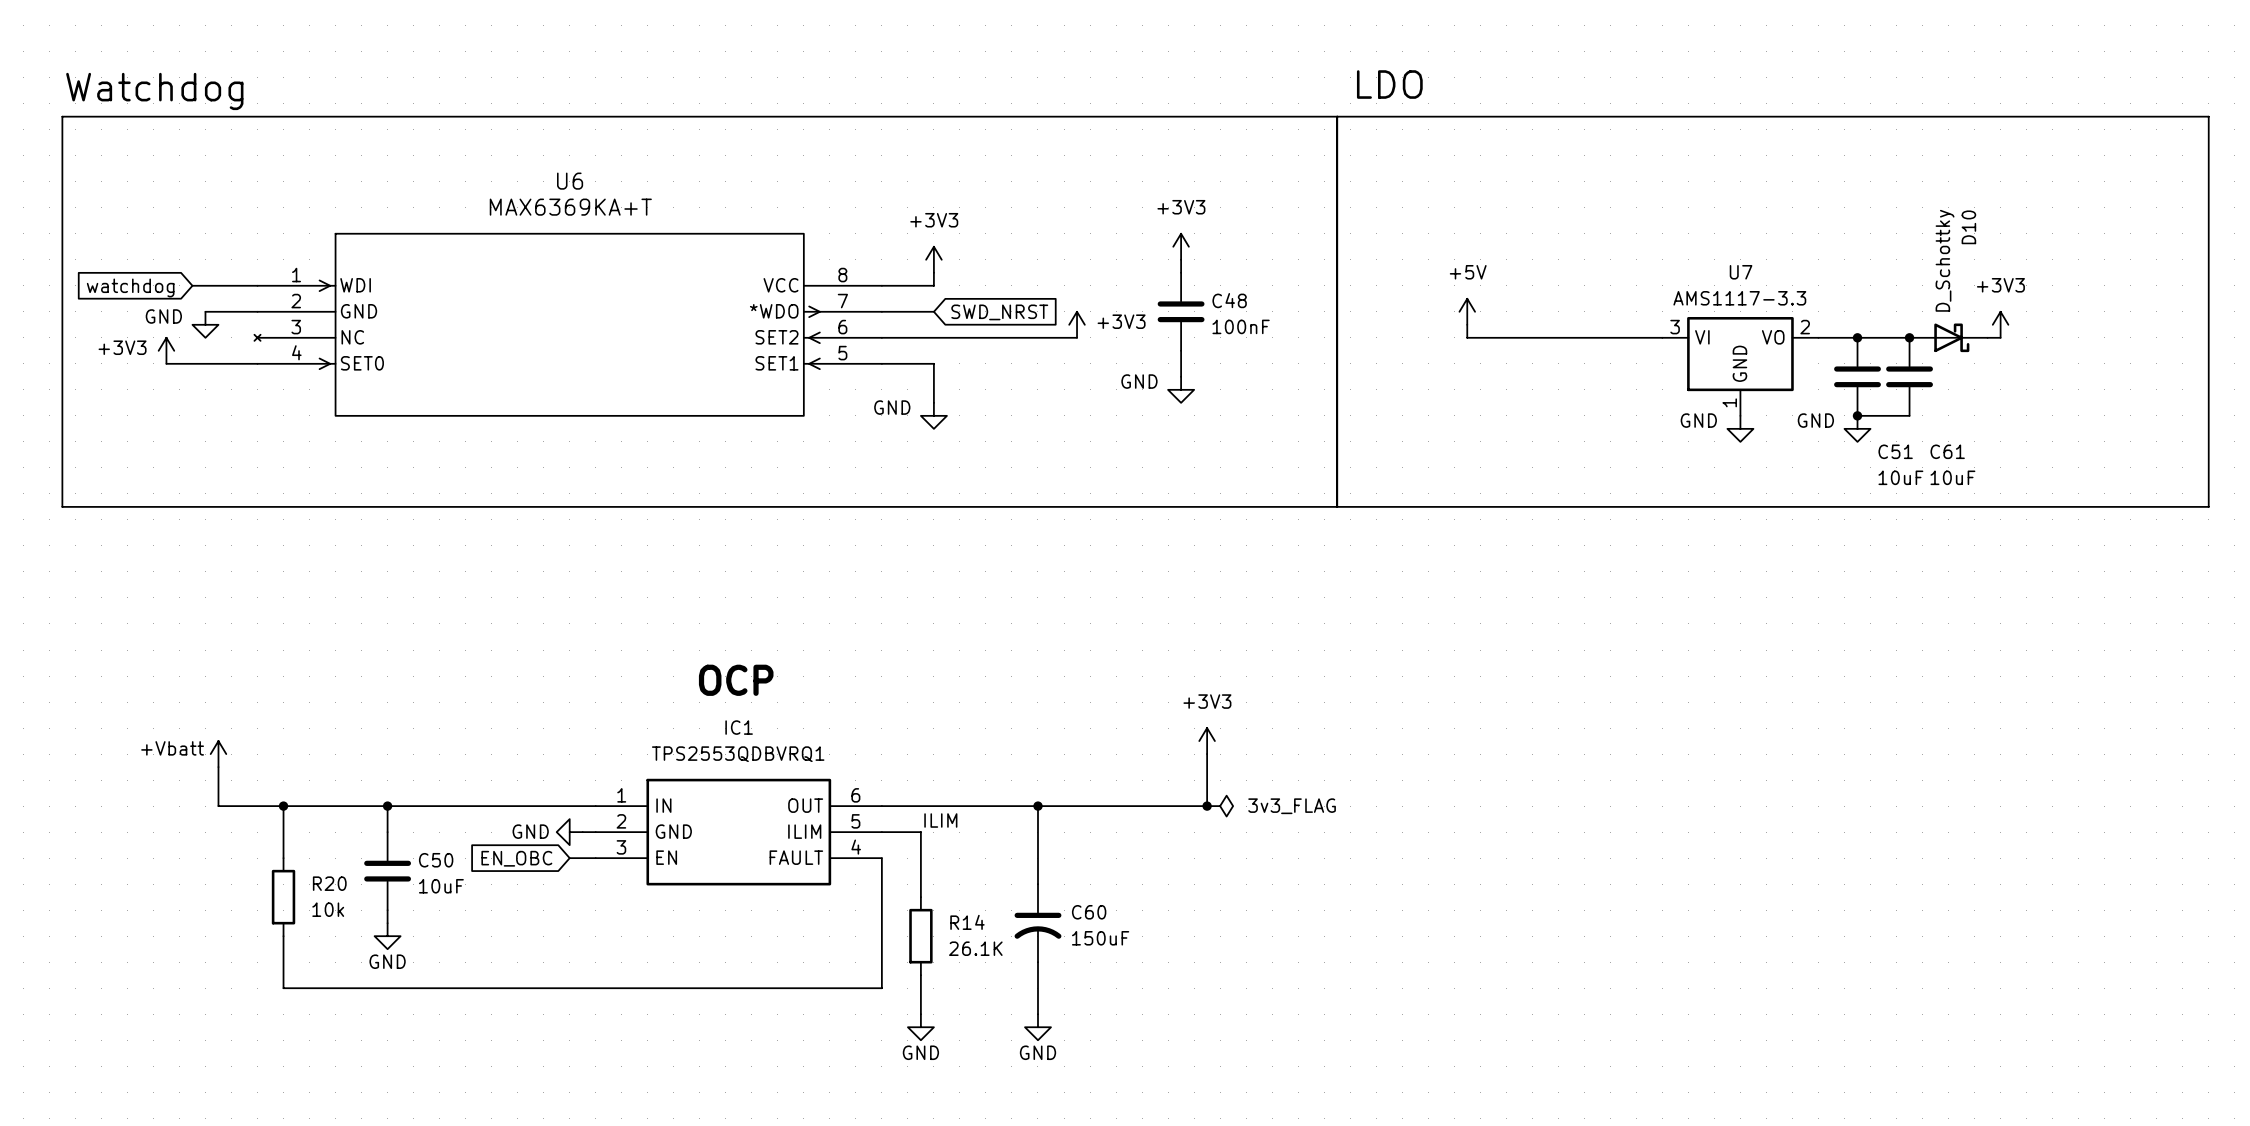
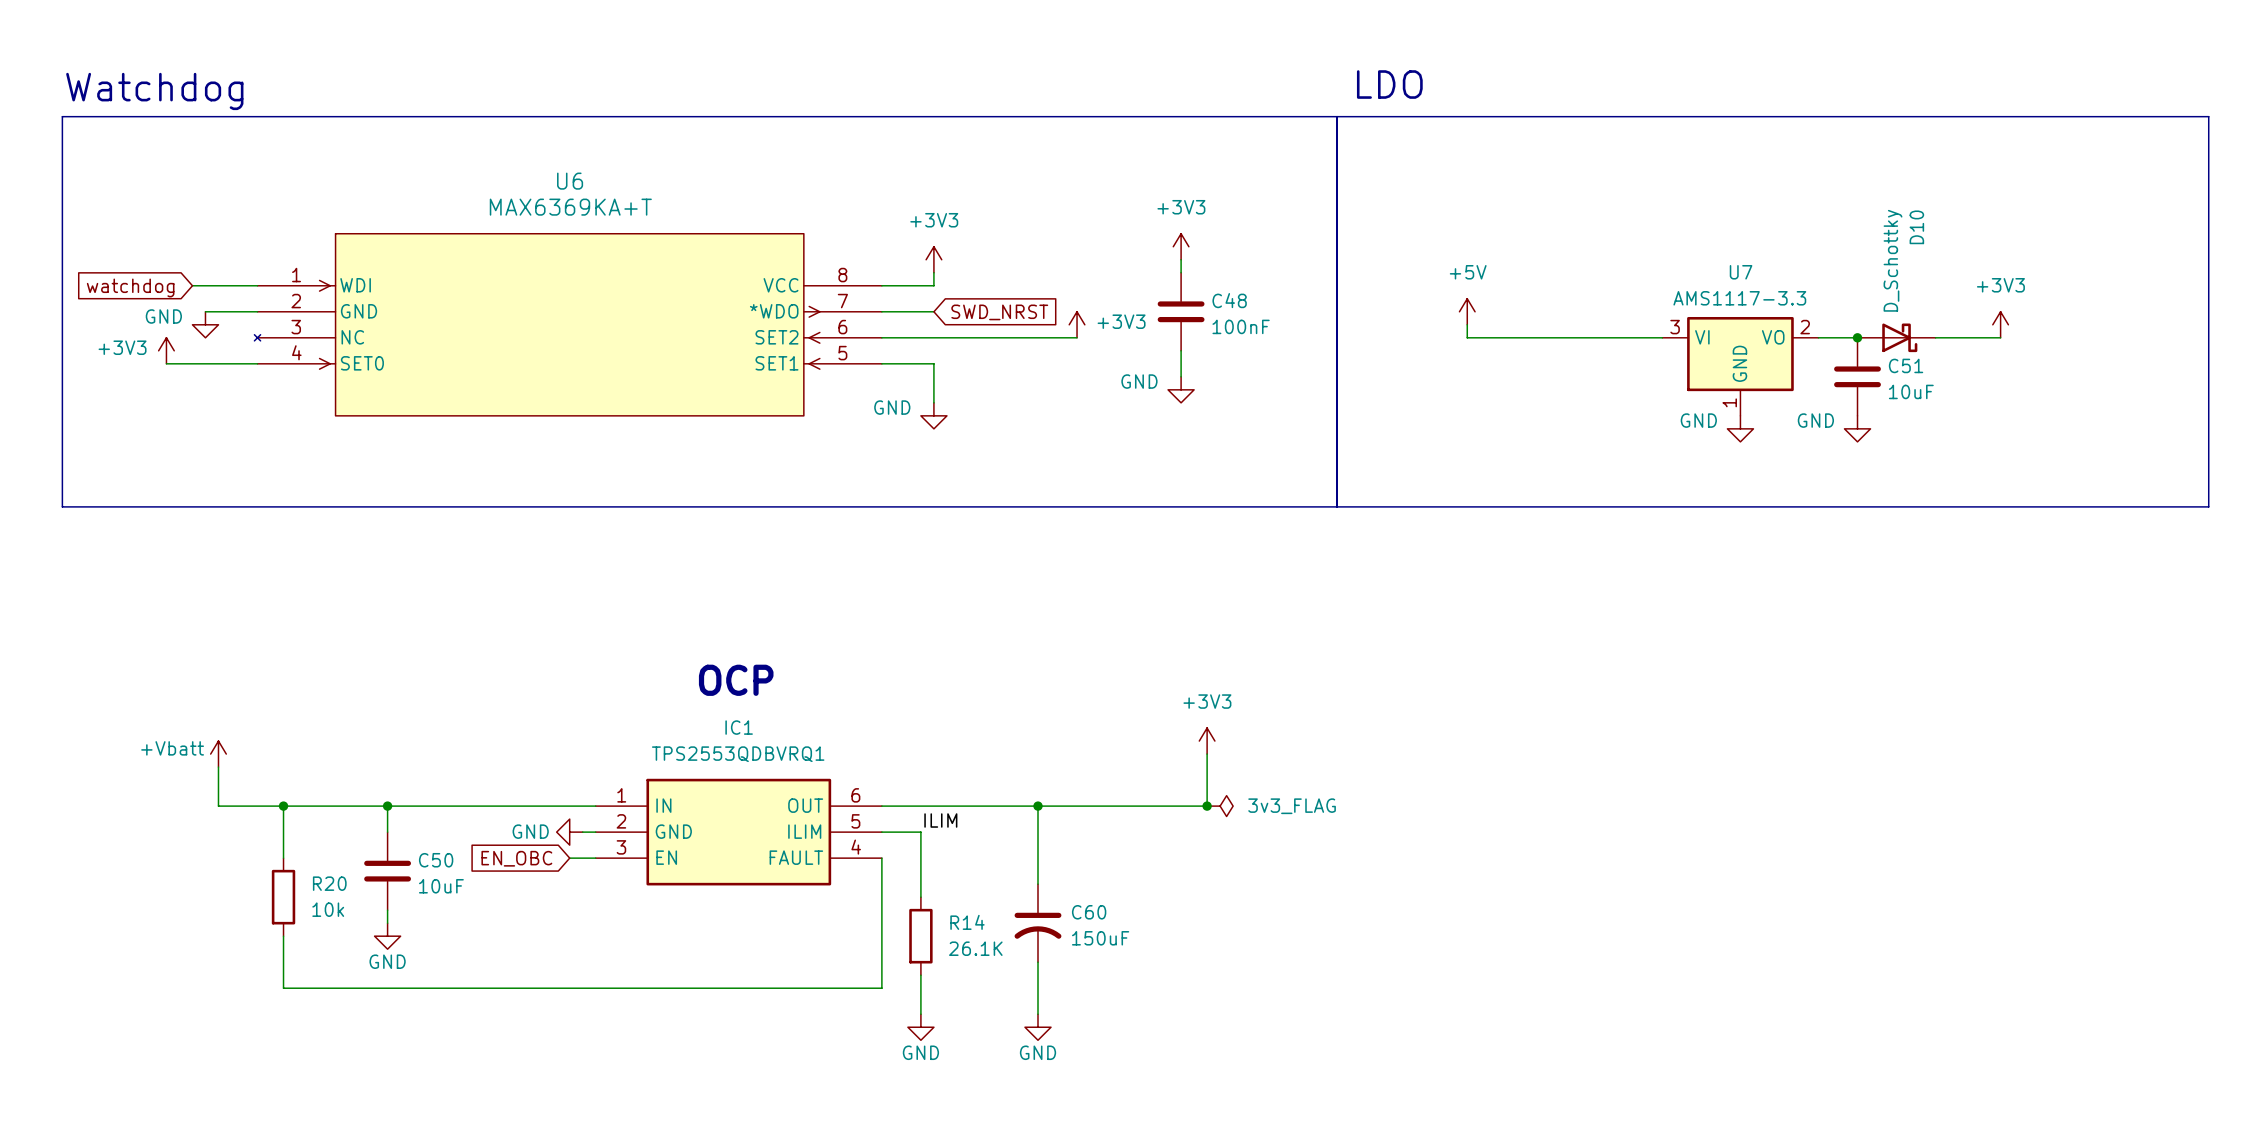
junction: (1909, 337) -> none
D10 position: (1948, 337) -> (1896, 337)
C61: 10uF (1909, 376) -> none
wire: (1857, 415) (1909, 415) -> none
junction: (1857, 415) -> none
C51 name position: C51 (1895, 451) -> C51 (1906, 365)
C51 value position: 10uF (1900, 477) -> 10uF (1911, 391)

